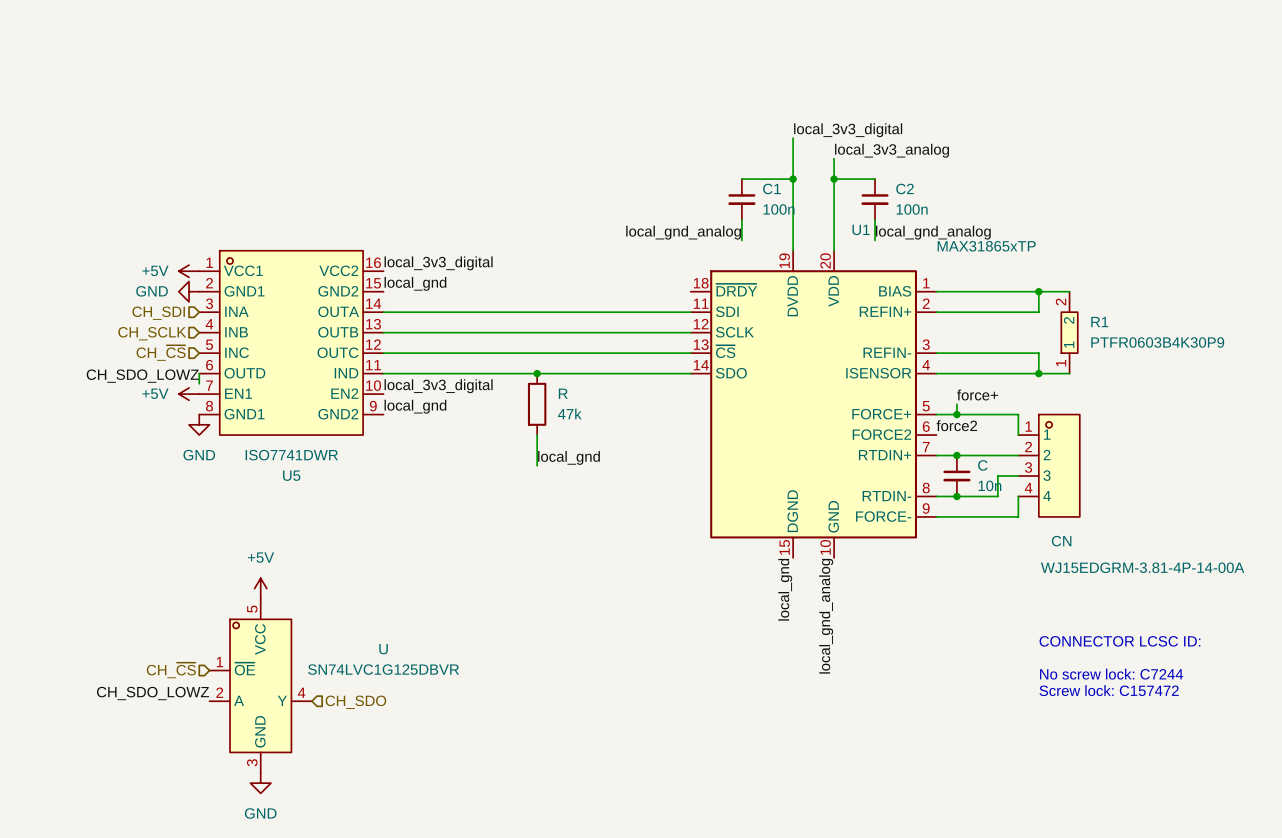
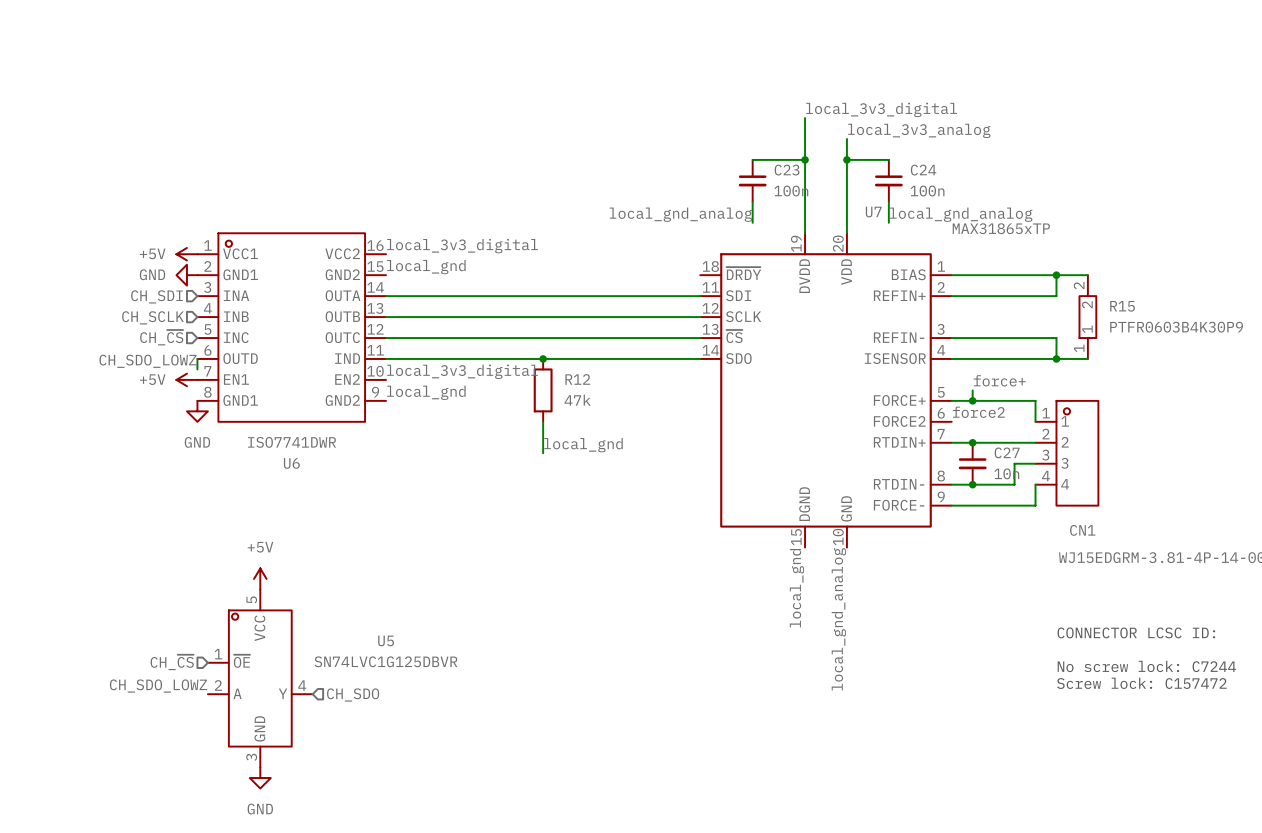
C1 name: C1 (771, 188) -> C23 (787, 170)
C2 name: C2 (905, 188) -> C24 (923, 170)
U1 name: U1 (861, 229) -> U7 (873, 212)
R1 name: R1 (1099, 322) -> R15 (1122, 306)
R name: R (563, 393) -> R12 (577, 379)
C name: C (982, 465) -> C27 (1007, 452)
U5 name: U5 (291, 475) -> U6 (291, 463)
CN name: CN (1061, 541) -> CN1 (1082, 530)
U name: U (383, 649) -> U5 (386, 640)

